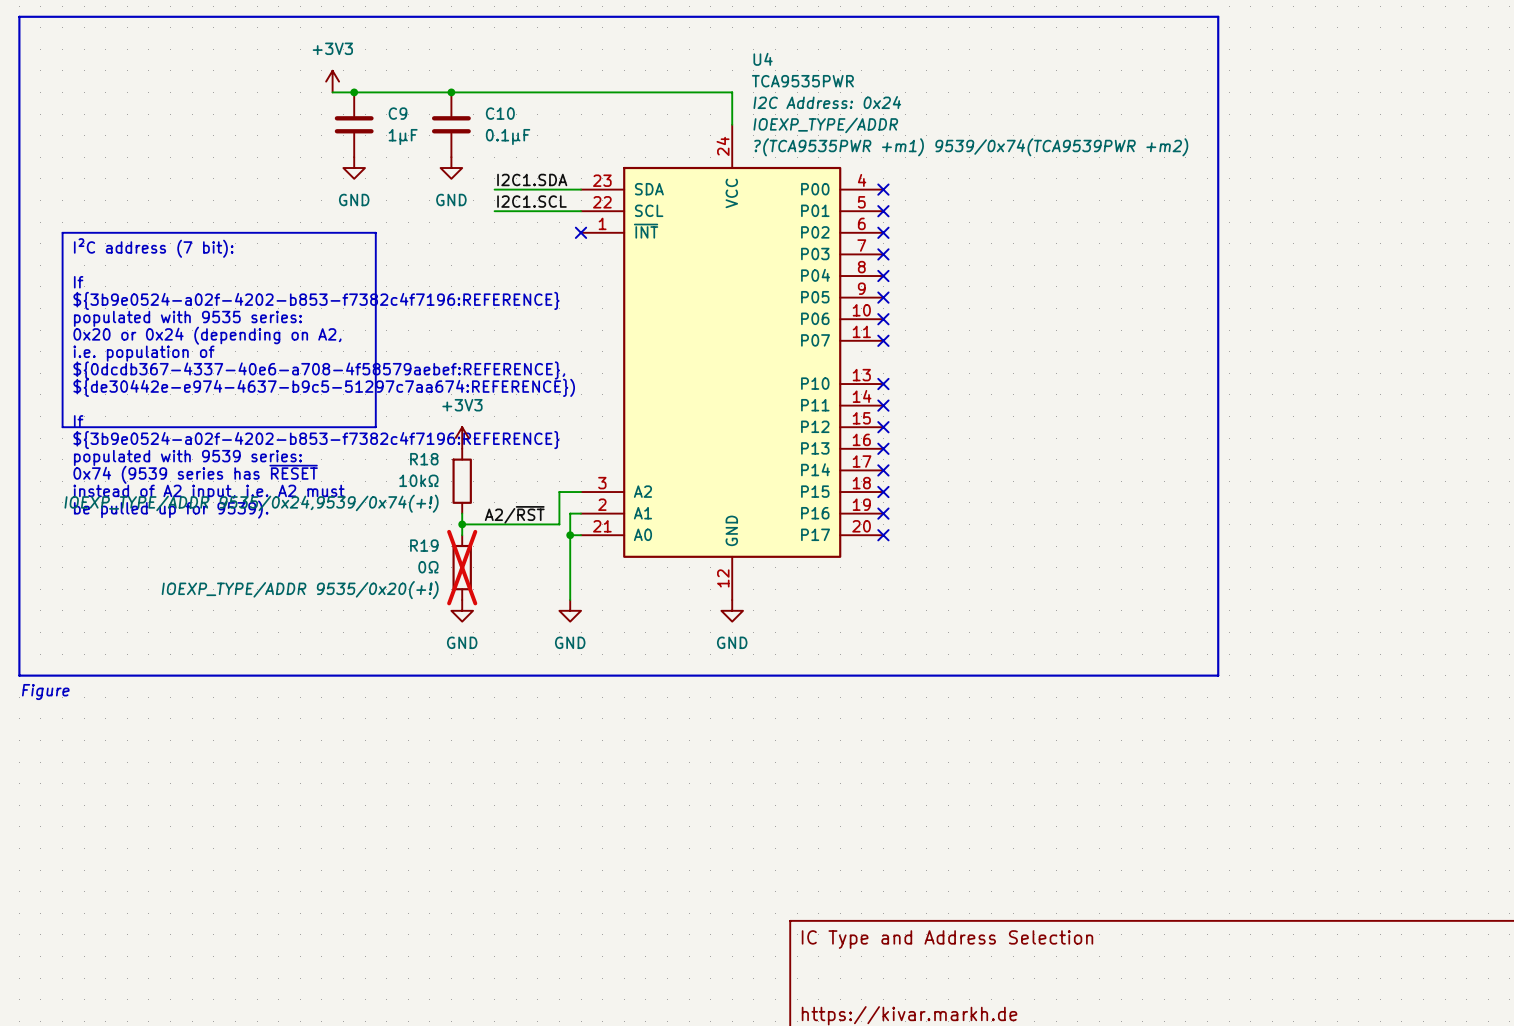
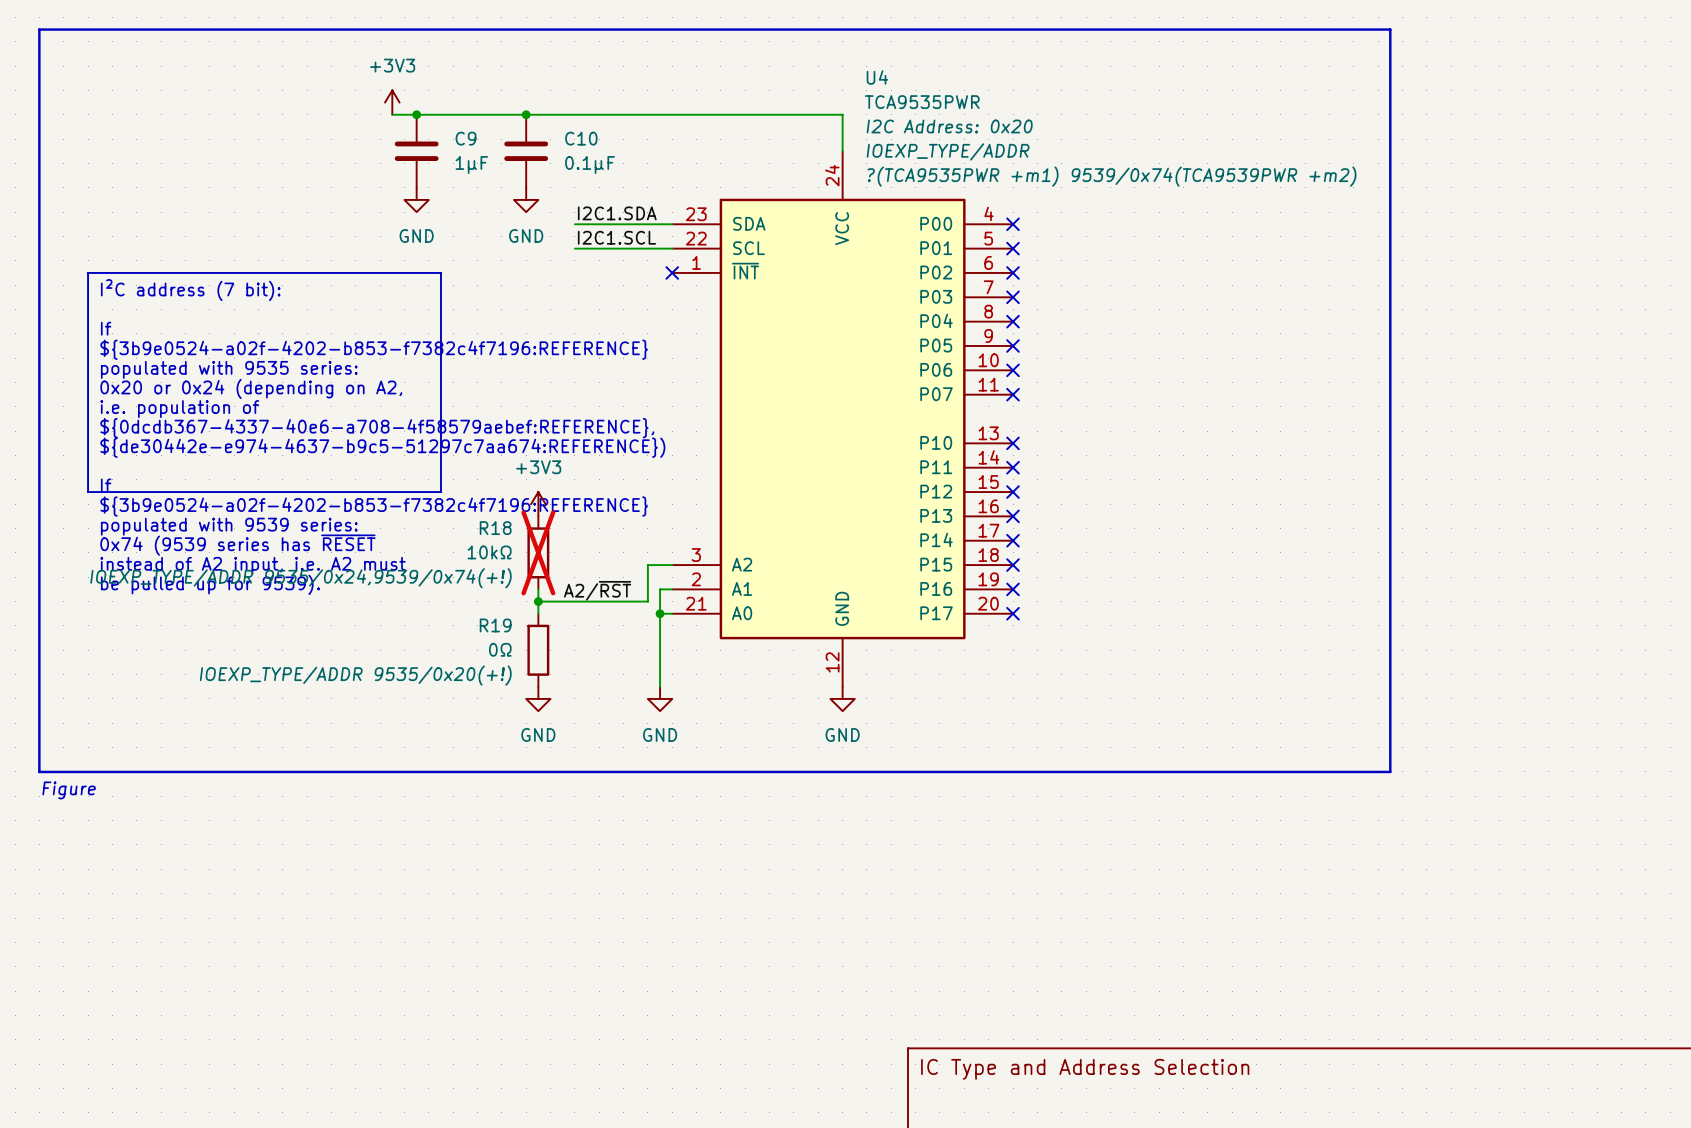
U4 text: I2C Address: 0x24 (827, 102) -> I2C Address: 0x20 (949, 126)
R18 do-not-place cross: none -> (538, 552)
R19 do-not-place cross: (462, 567) -> none

